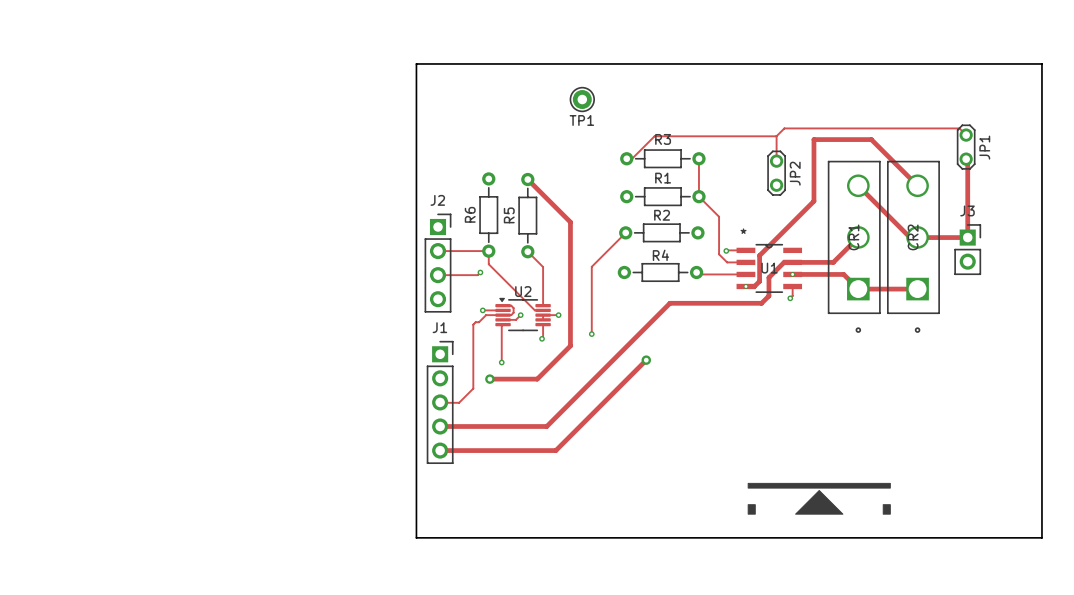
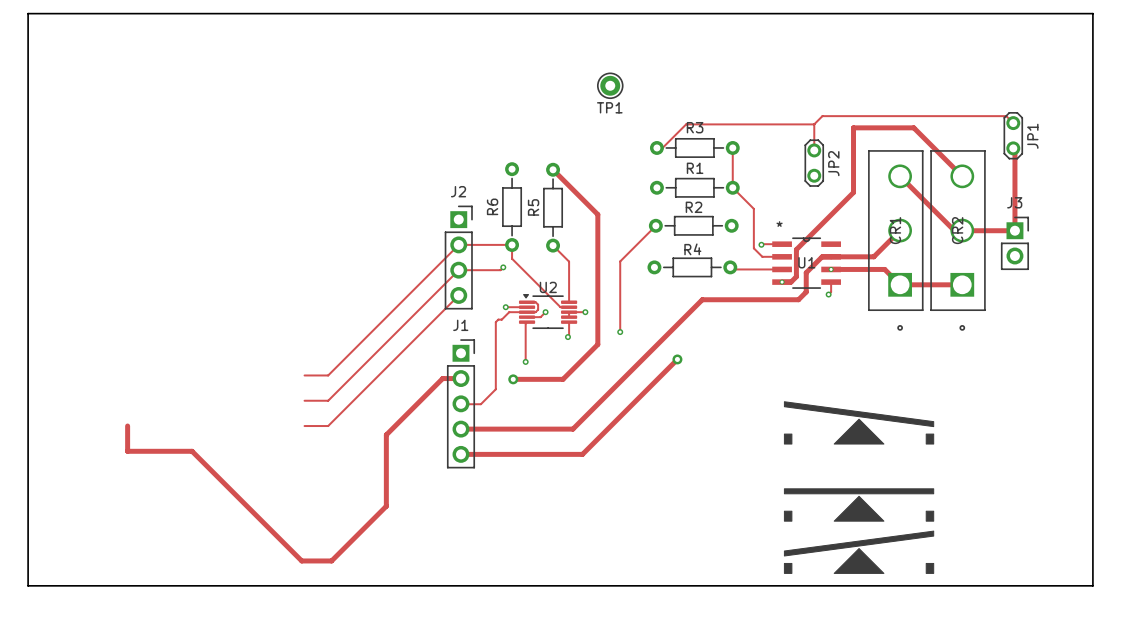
board edge: (1041, 63) (416, 63) (416, 537) (1041, 537) -> (1092, 48) (1092, 13) (28, 13) (28, 585) (1092, 585) (1092, 546)
track: none -> (458, 244) (328, 375) (304, 375)
track: none -> (458, 270) (328, 400) (304, 400)
track: none -> (458, 295) (328, 426) (304, 426)
track: none -> (460, 378) (442, 378) (386, 434) (386, 506) (331, 560) (301, 560) (192, 451) (127, 451) (127, 426)
drawing: none -> [783, 401, 935, 445]
drawing: none -> [783, 530, 935, 574]

